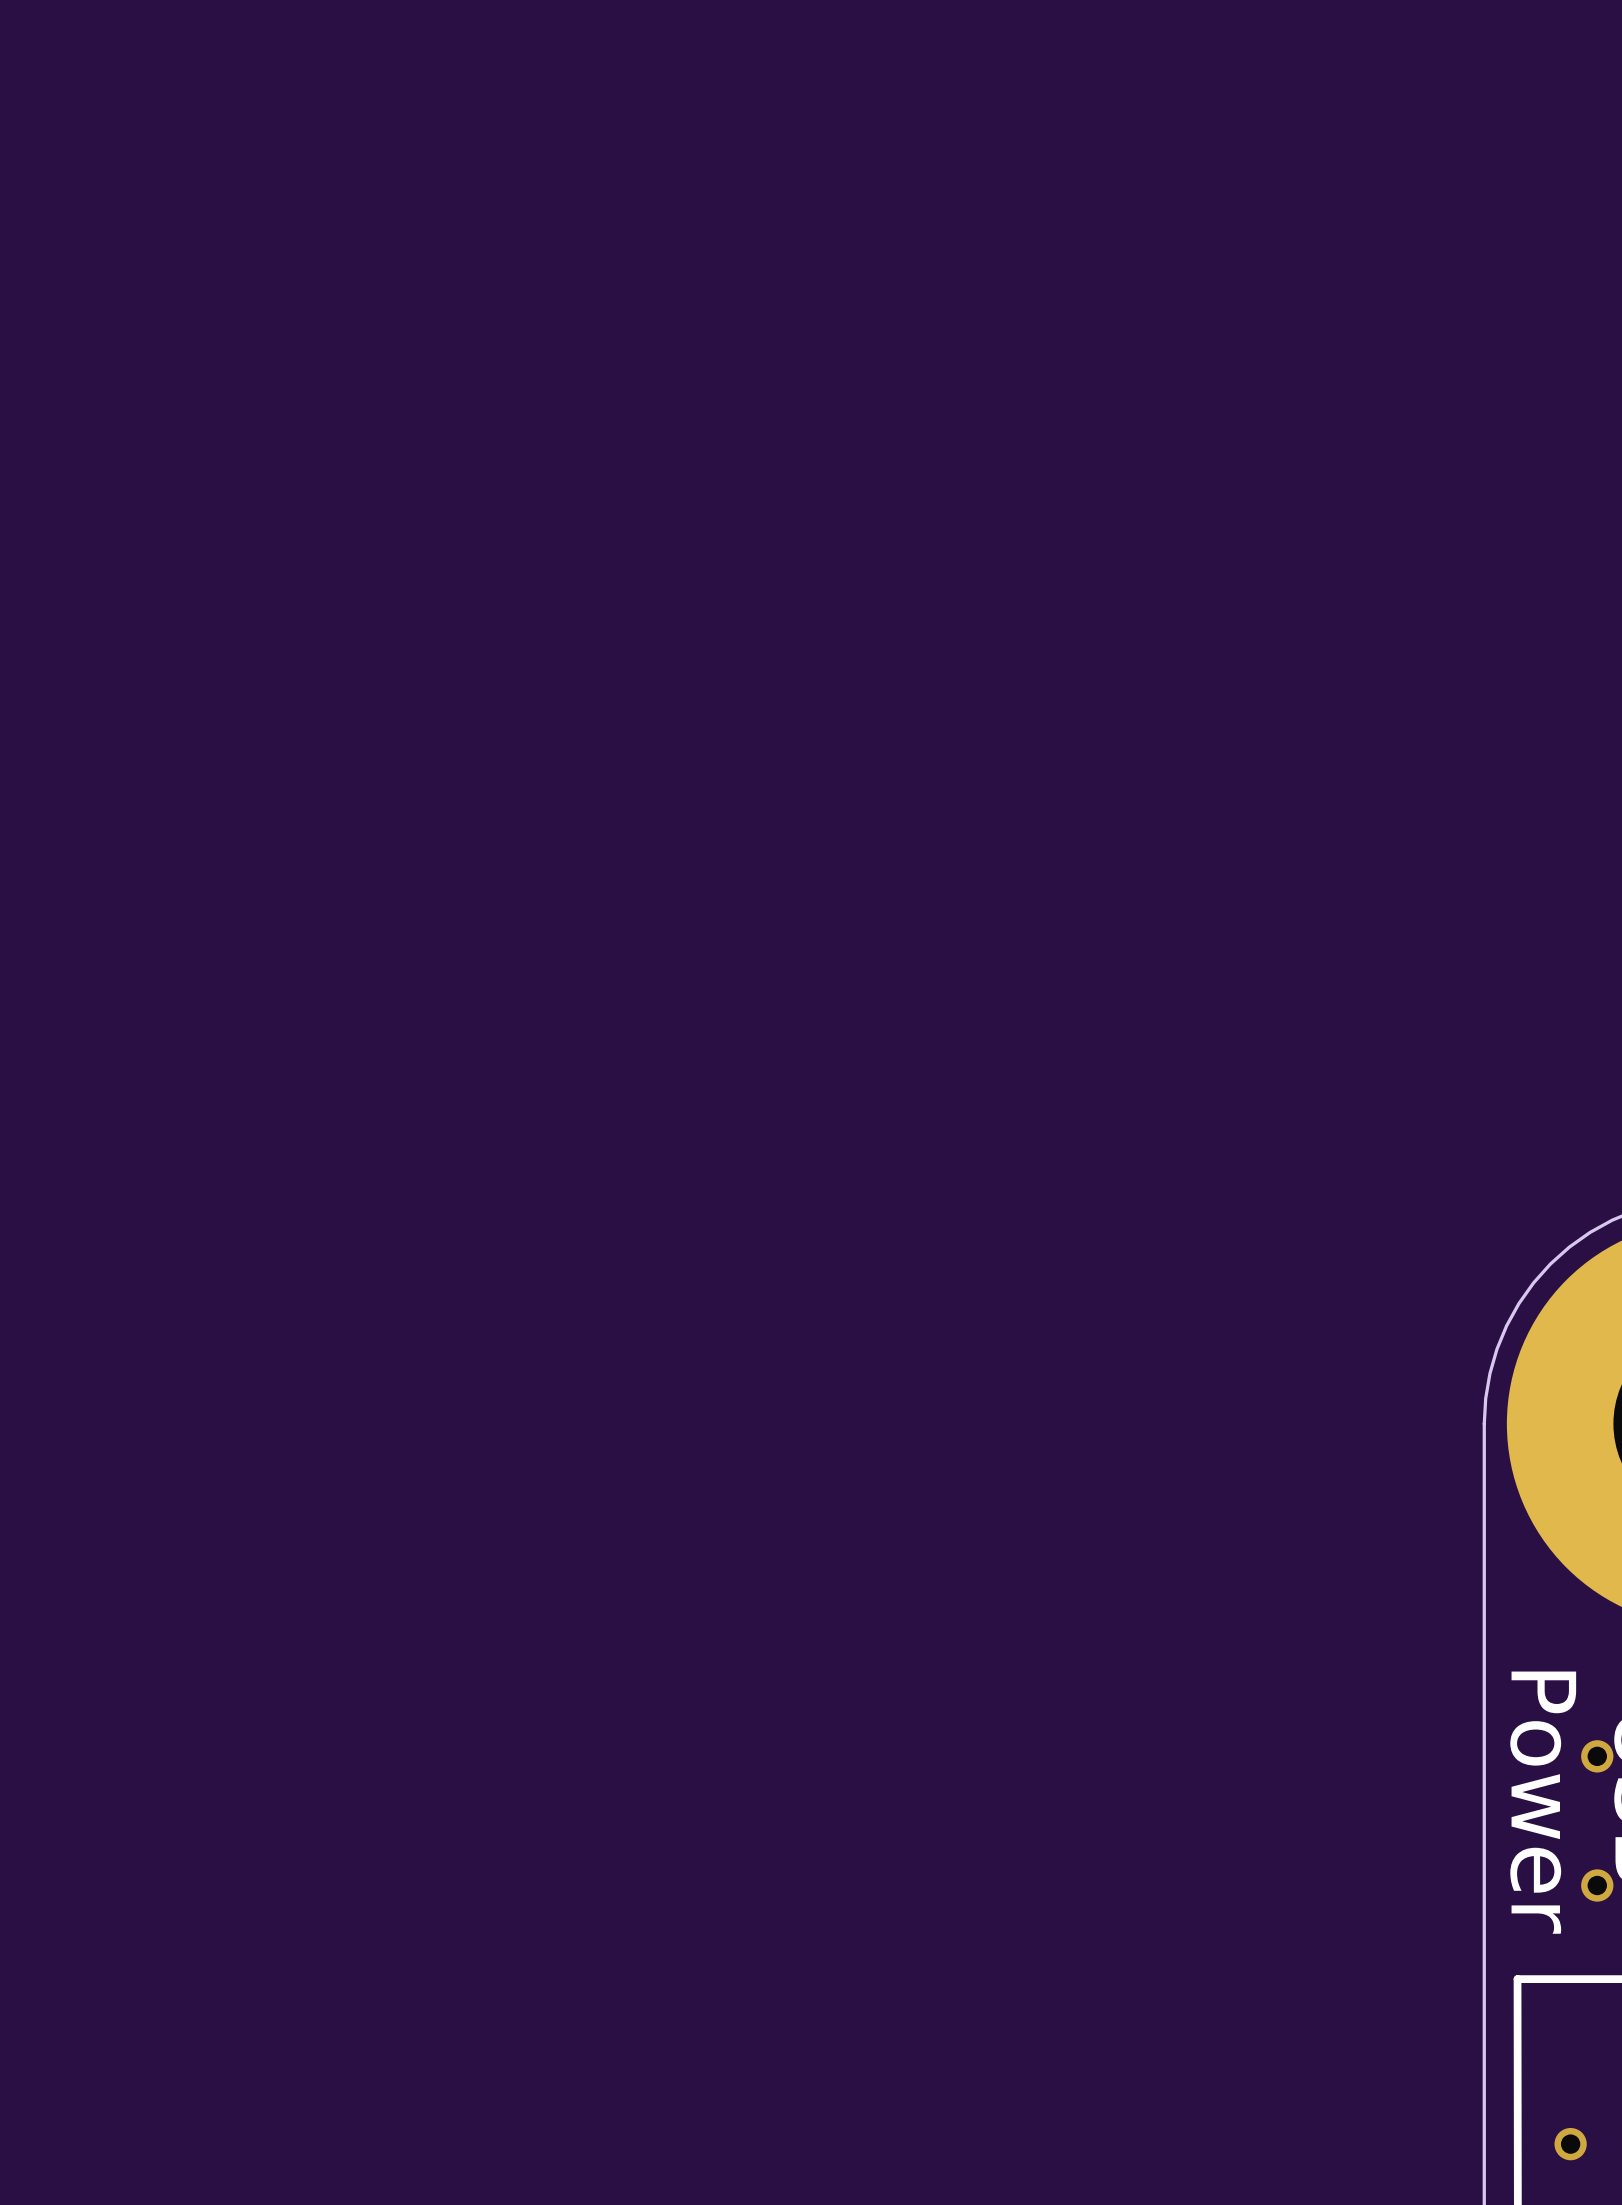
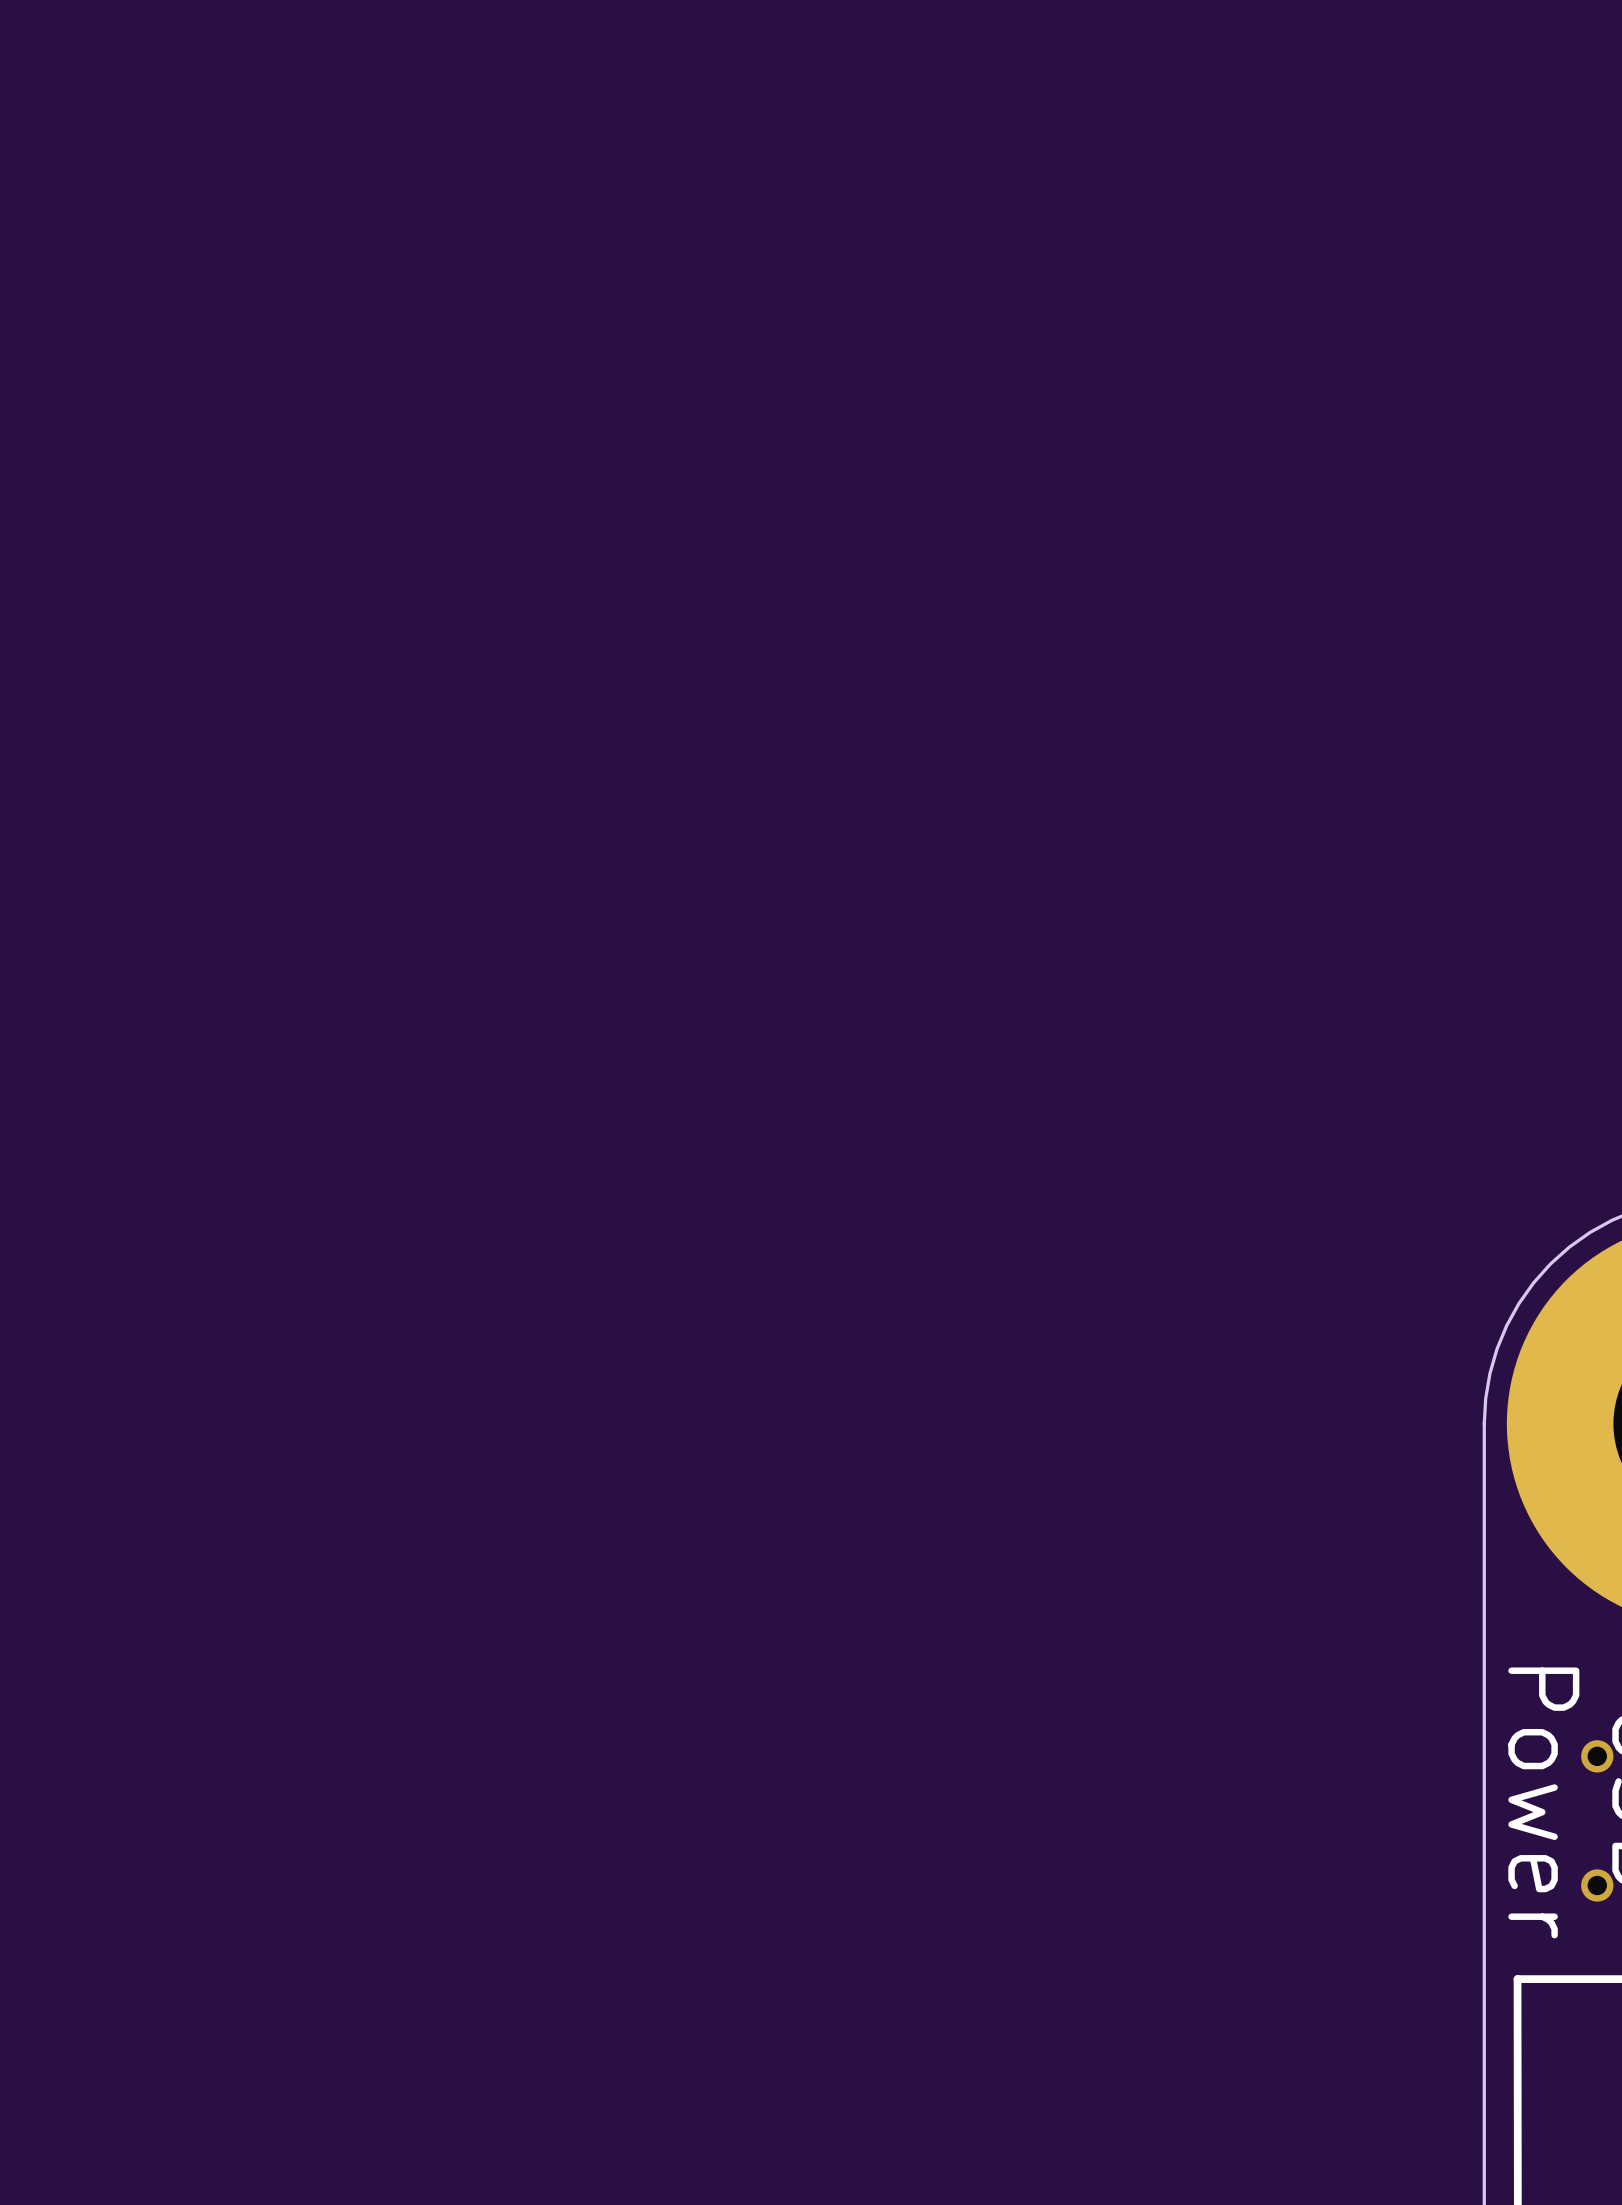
via: (1570, 2144) -> none

